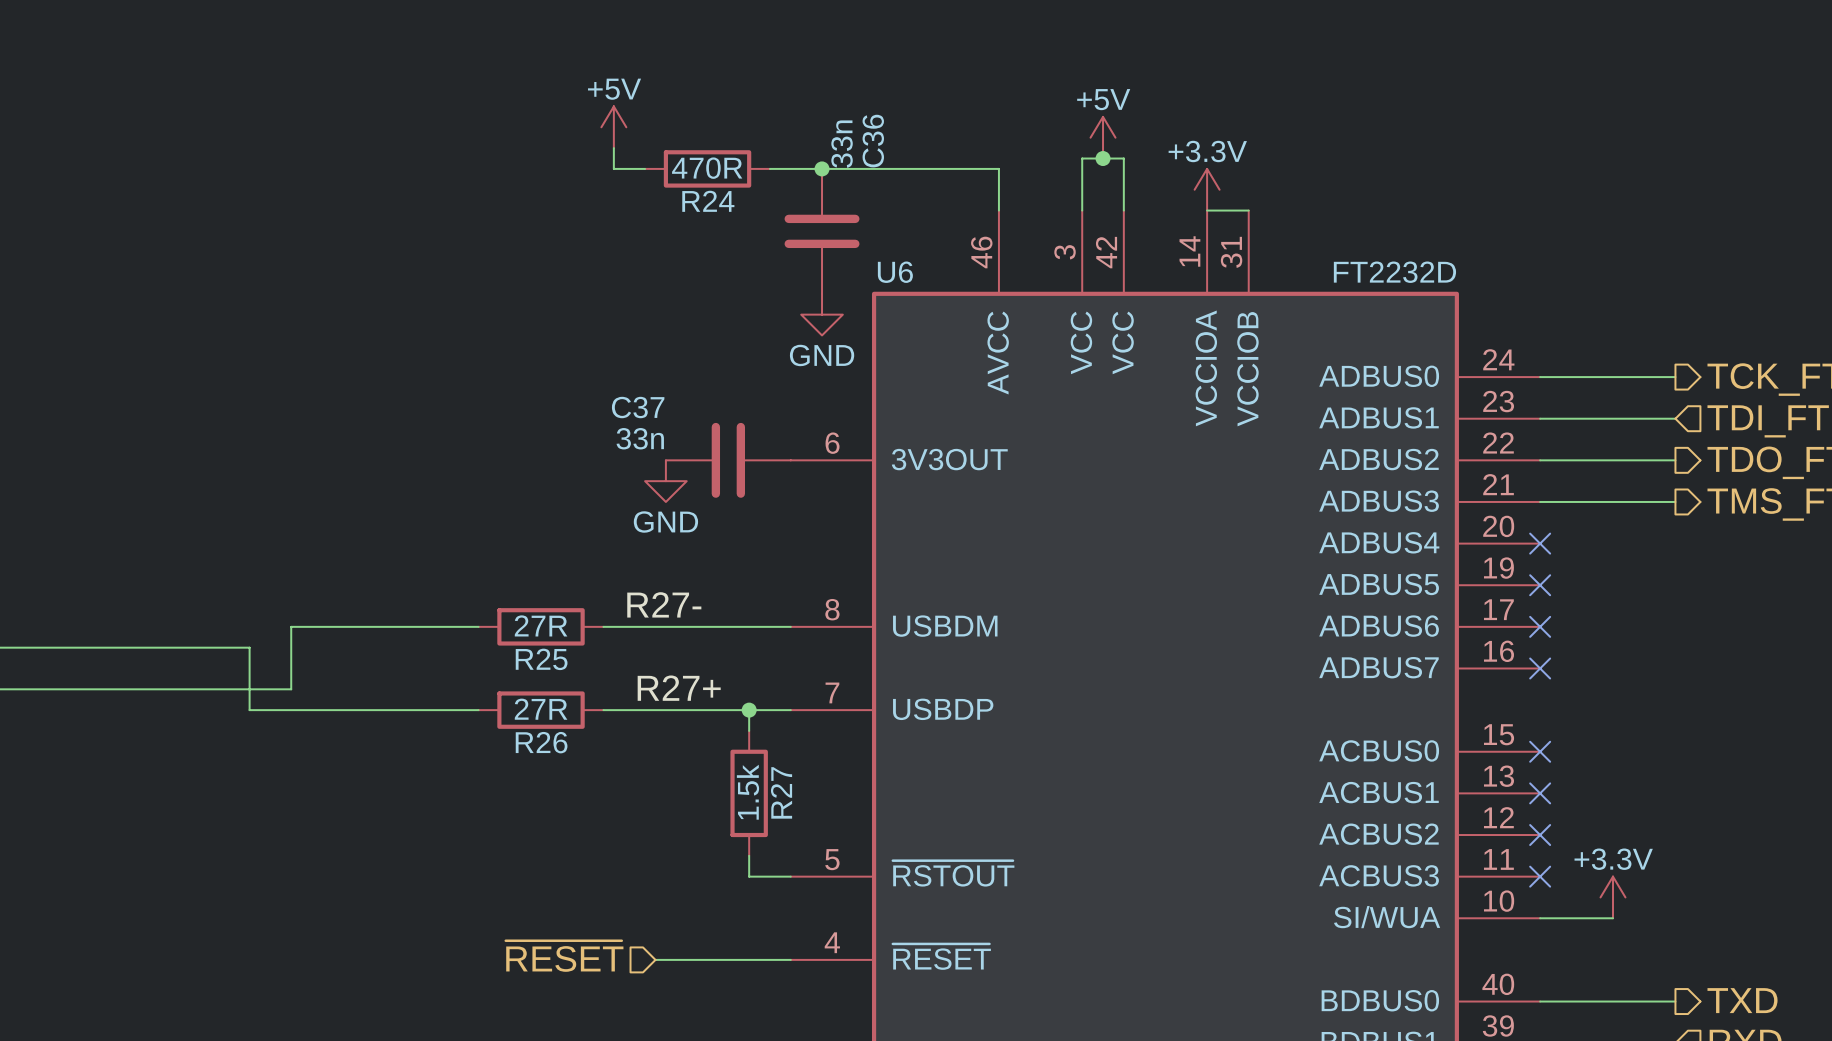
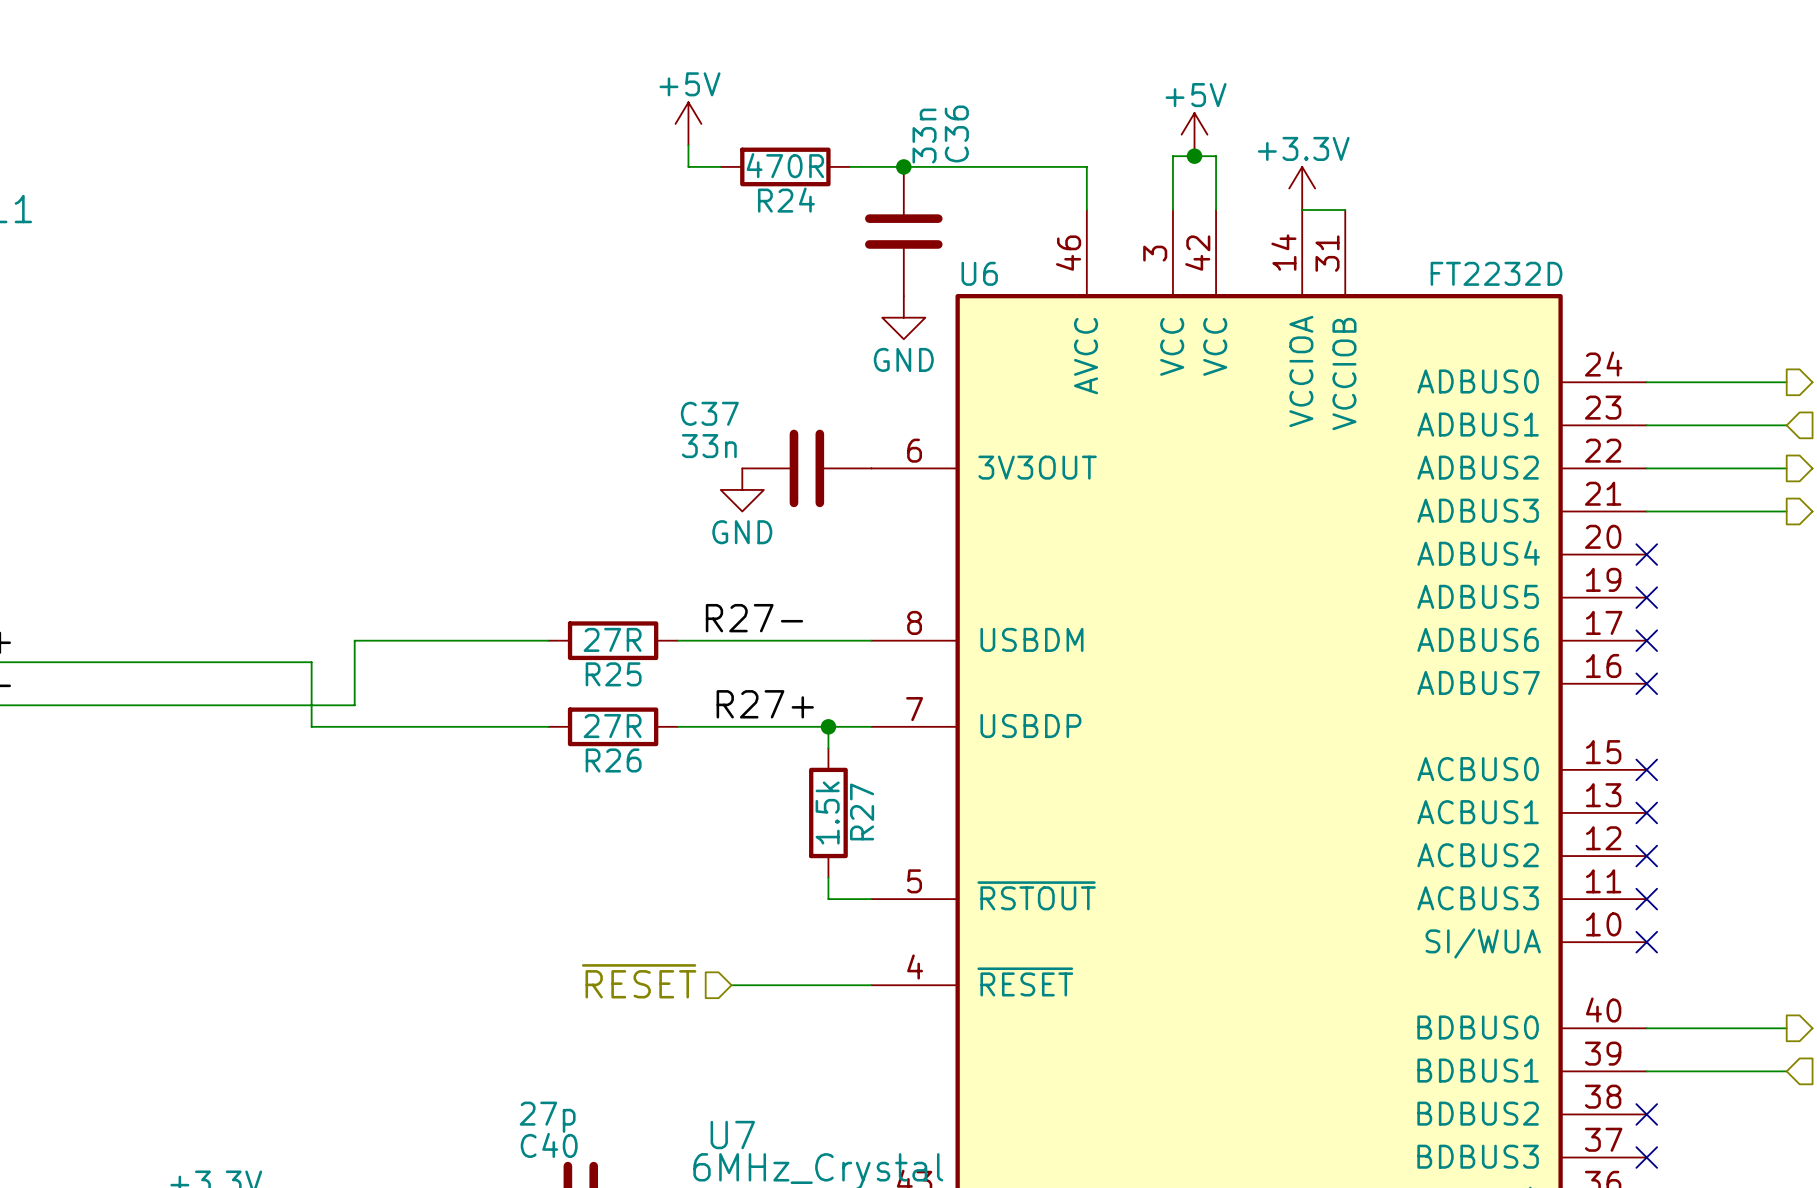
power symbol: +3.3V (1613, 897) -> none
wire: (1540, 918) (1613, 918) -> none
no-connect mark: none -> (1646, 942)

